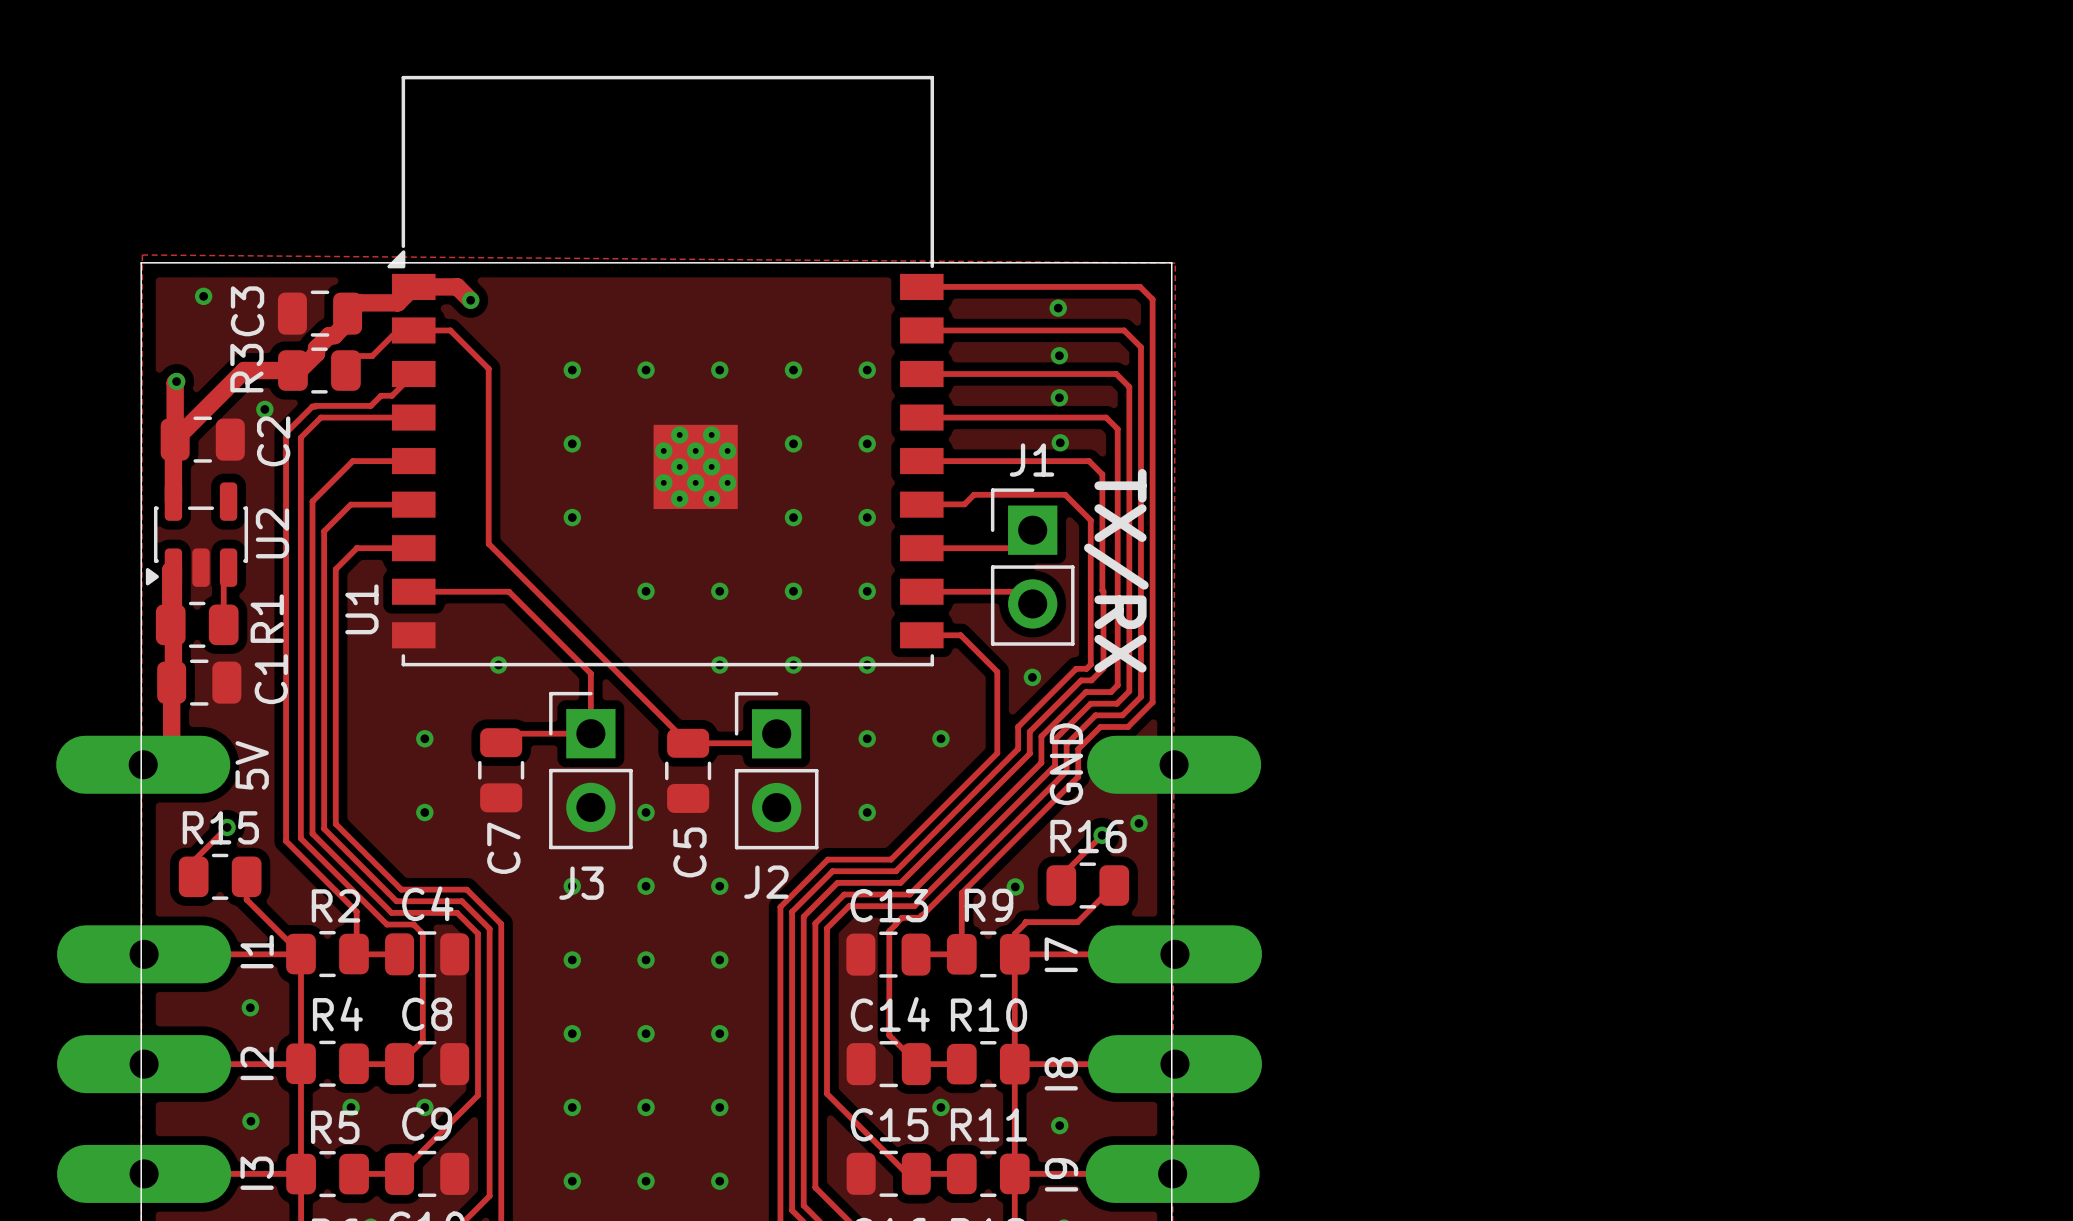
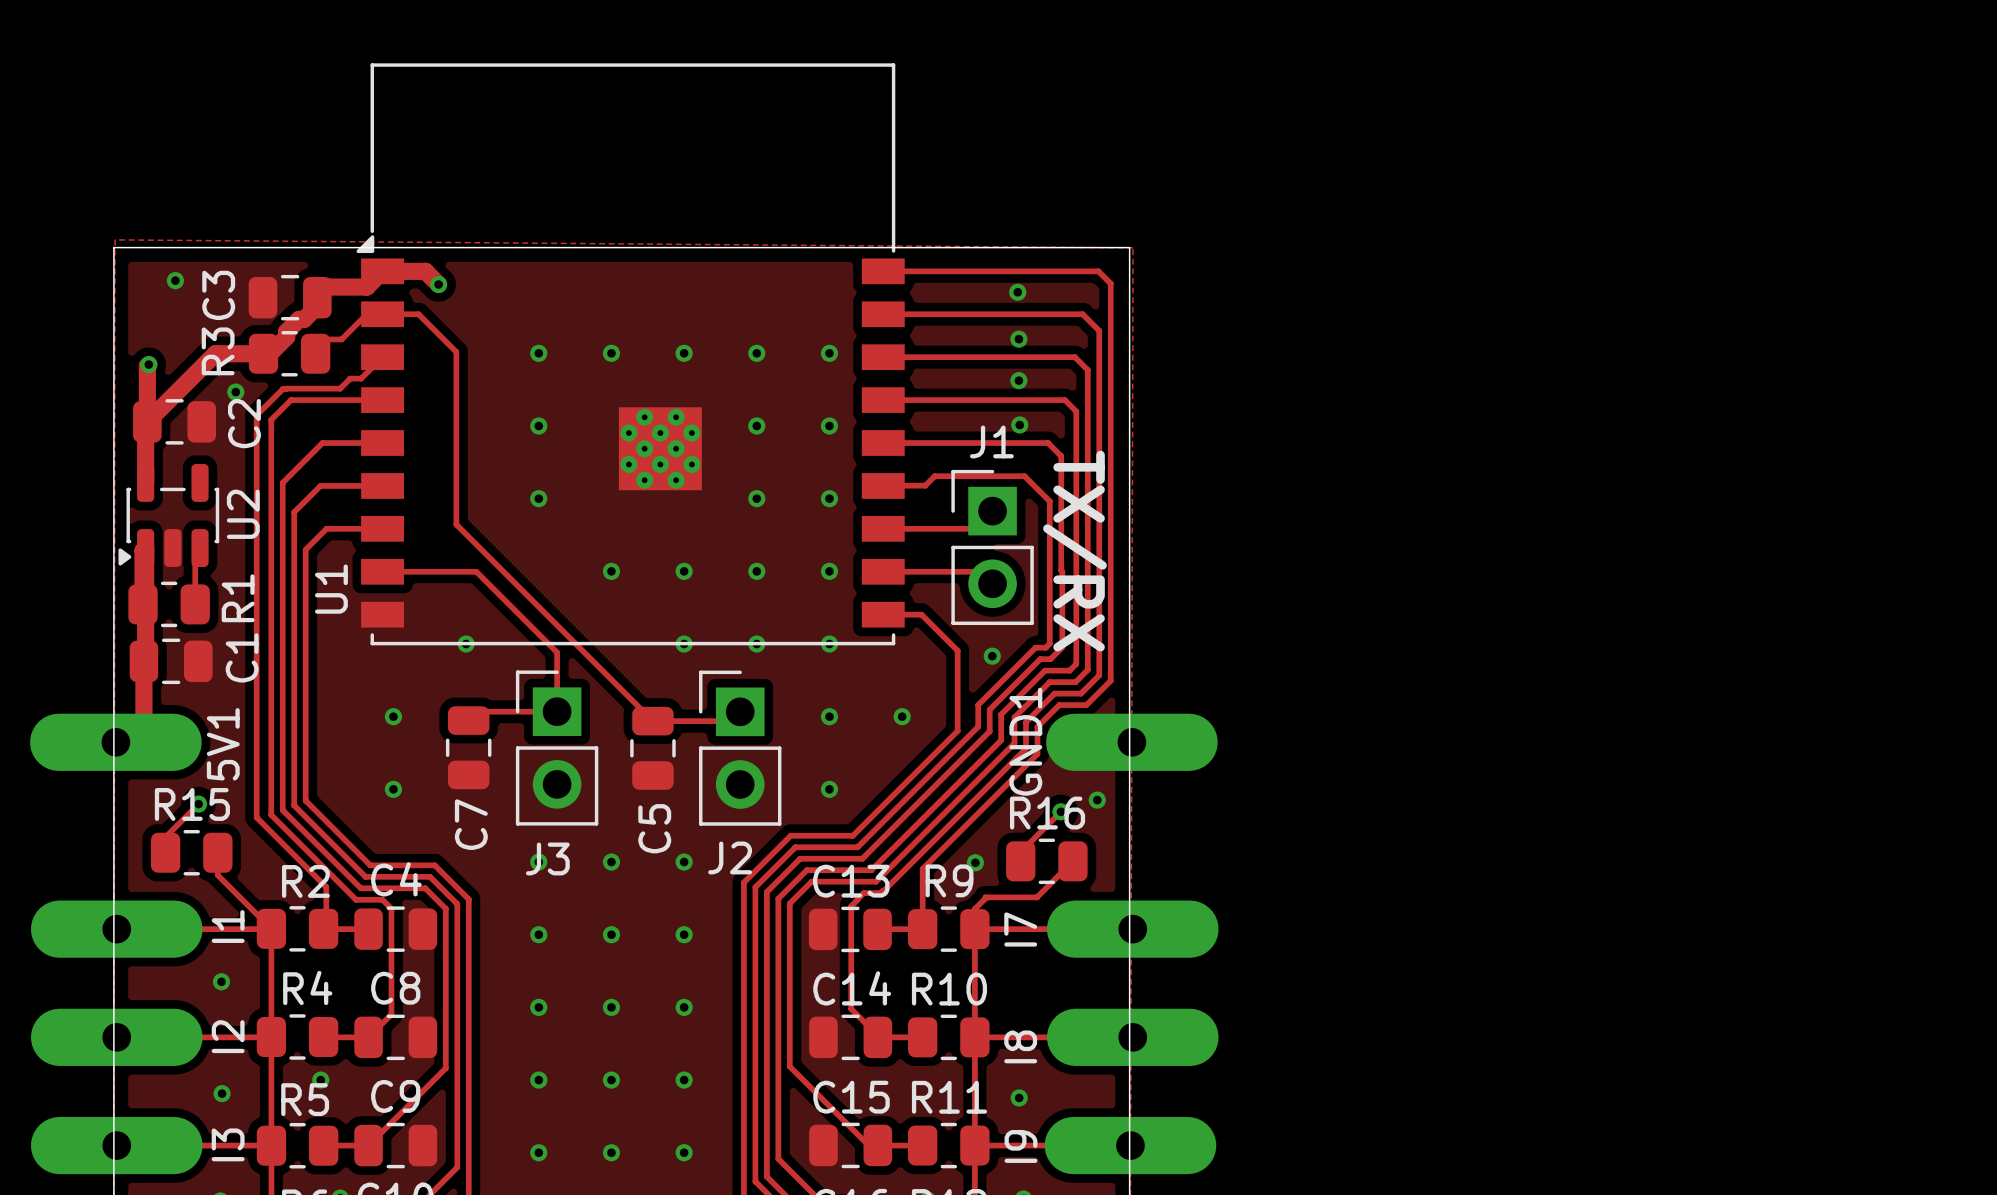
GND name: GND (1066, 764) -> GND1 (1025, 741)
5V name: 5V (252, 765) -> 5V1 (223, 744)
via: (646, 812) -> none
via: (424, 1107) -> none
via: (940, 1107) -> none

